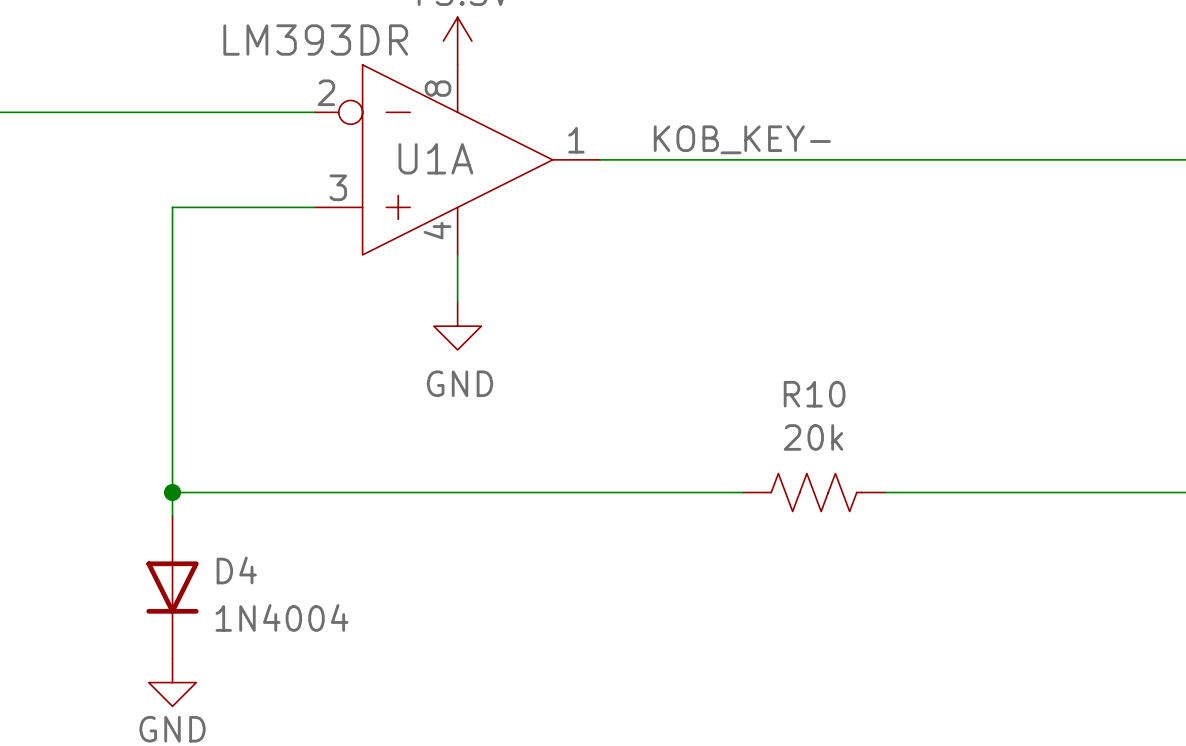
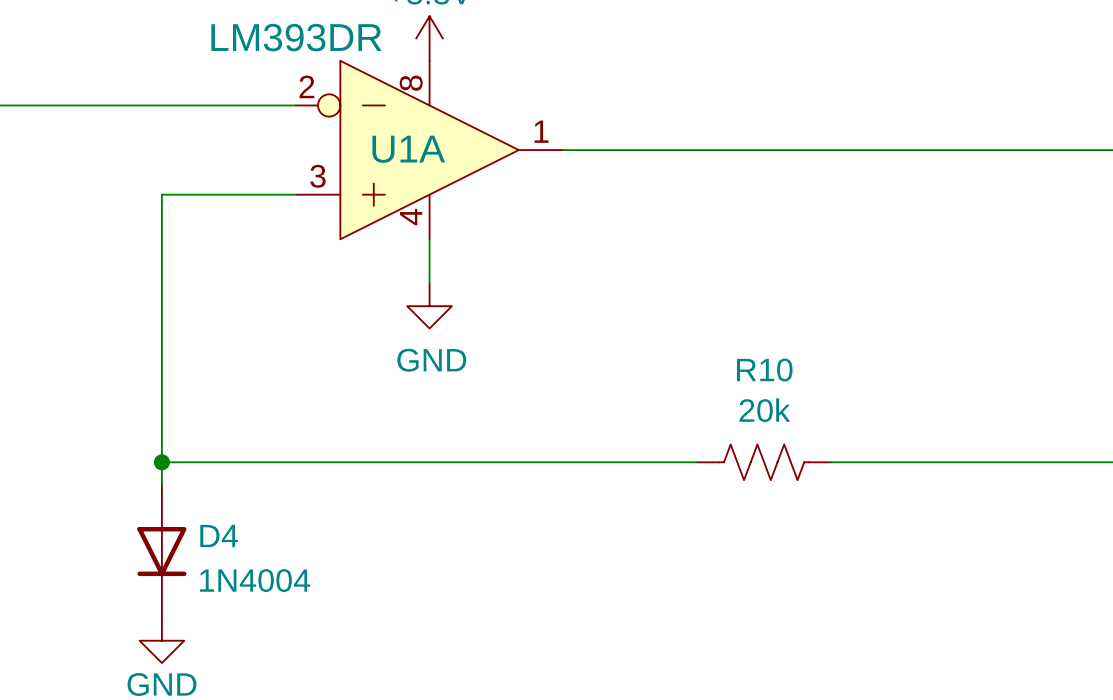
label: KOB_KEY- (742, 139) -> none

